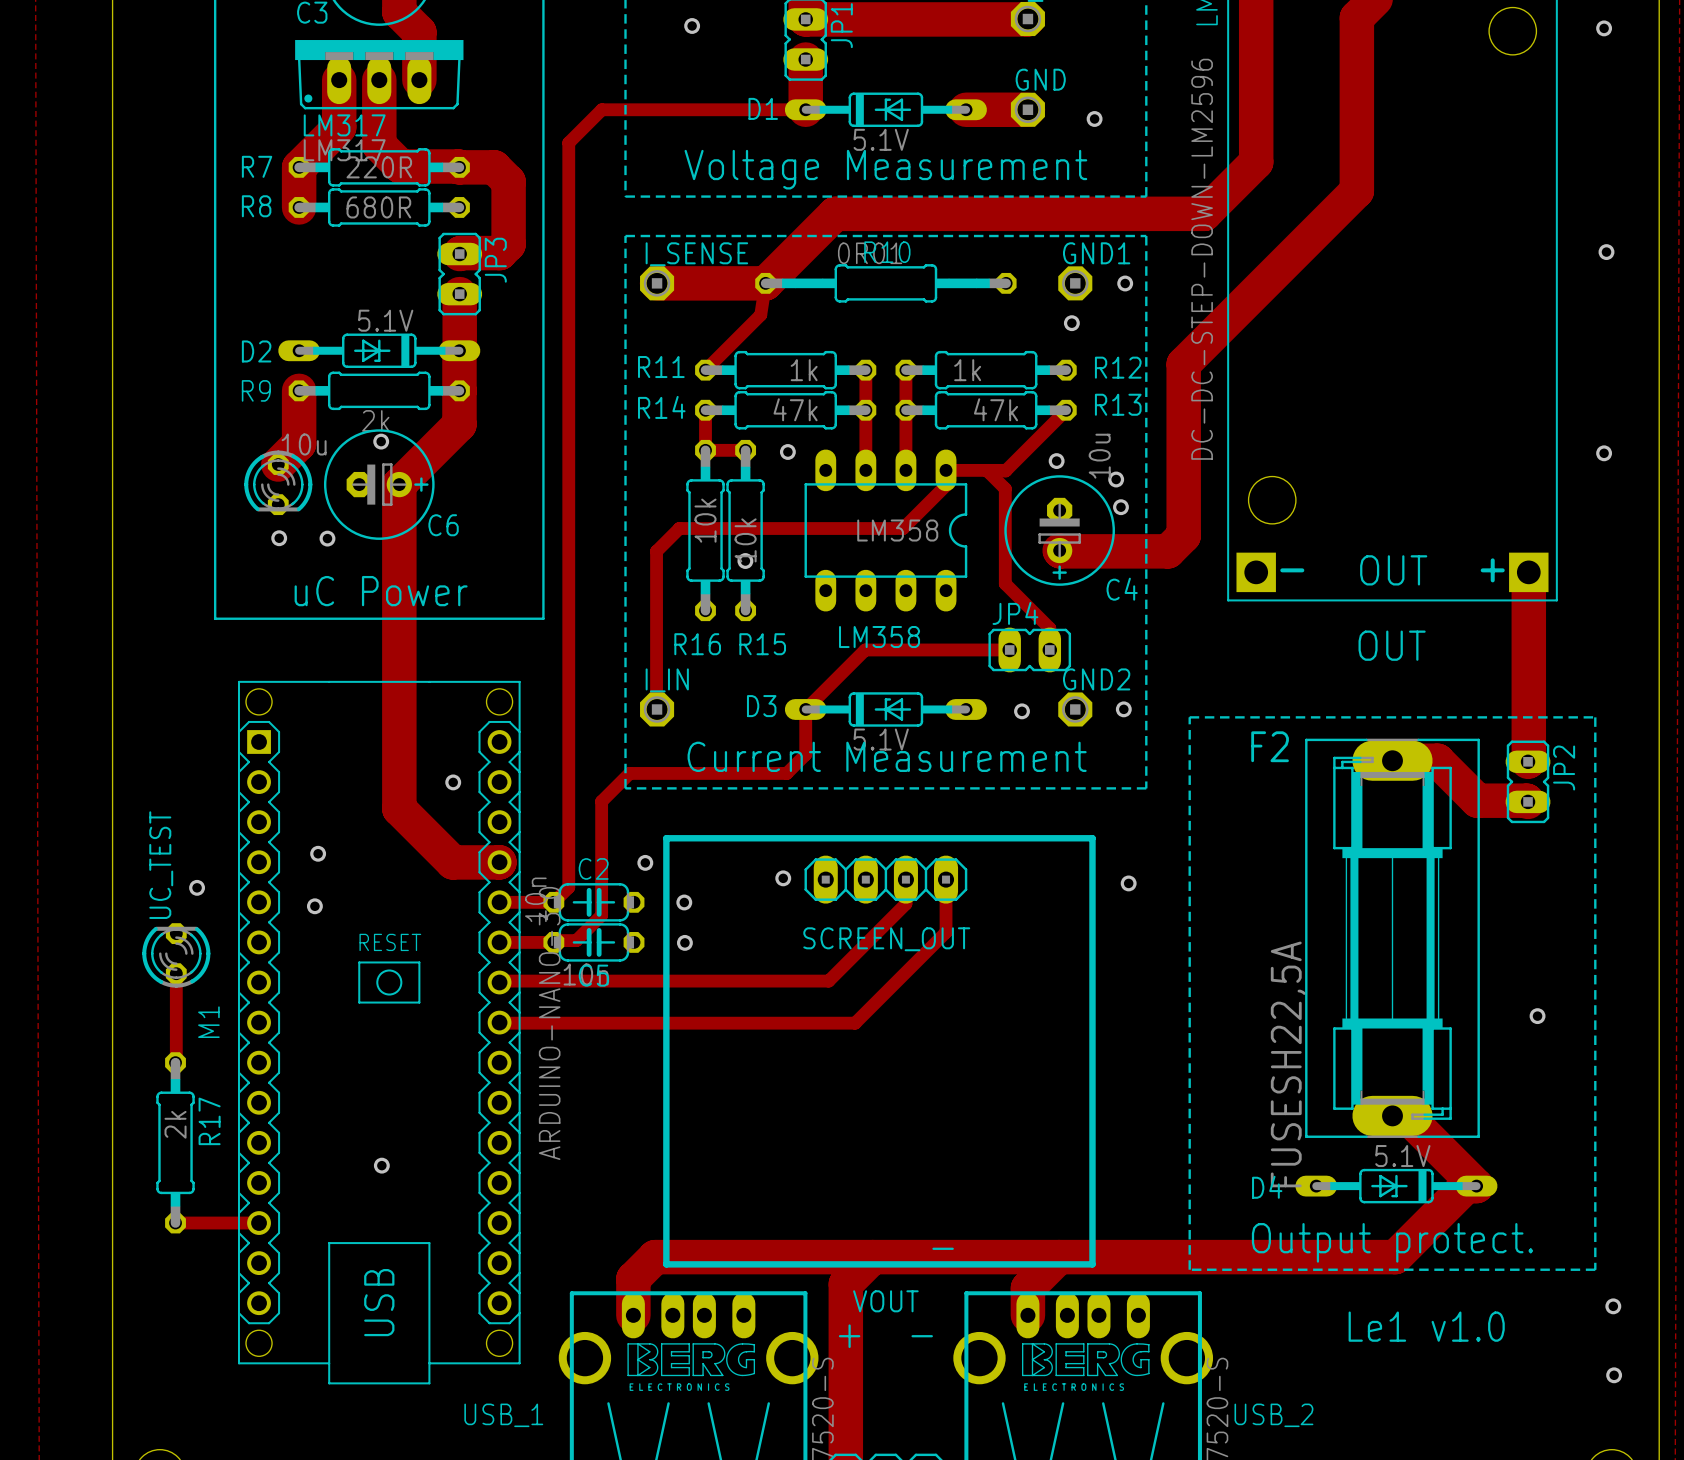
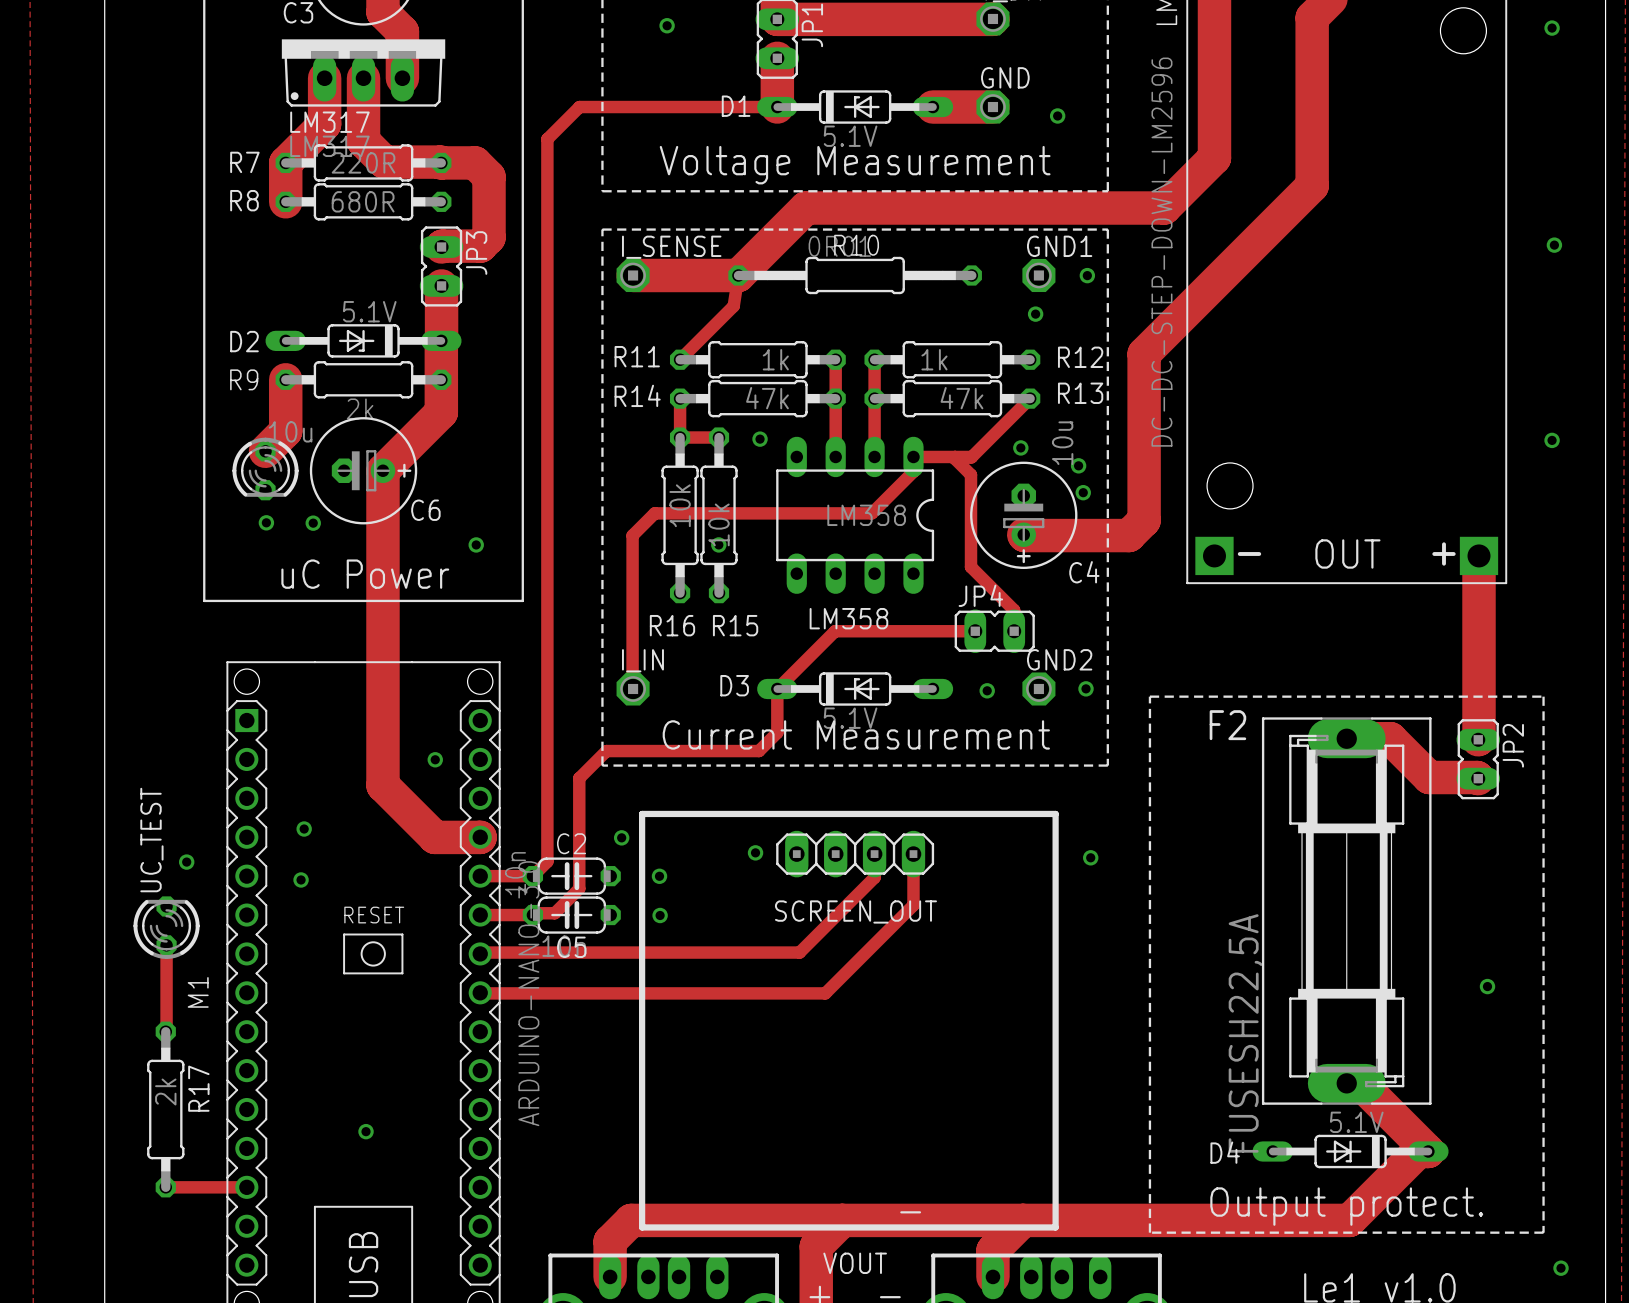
via: (381, 441) -> none
via: none -> (476, 544)
text: OUT (1392, 645) -> none

